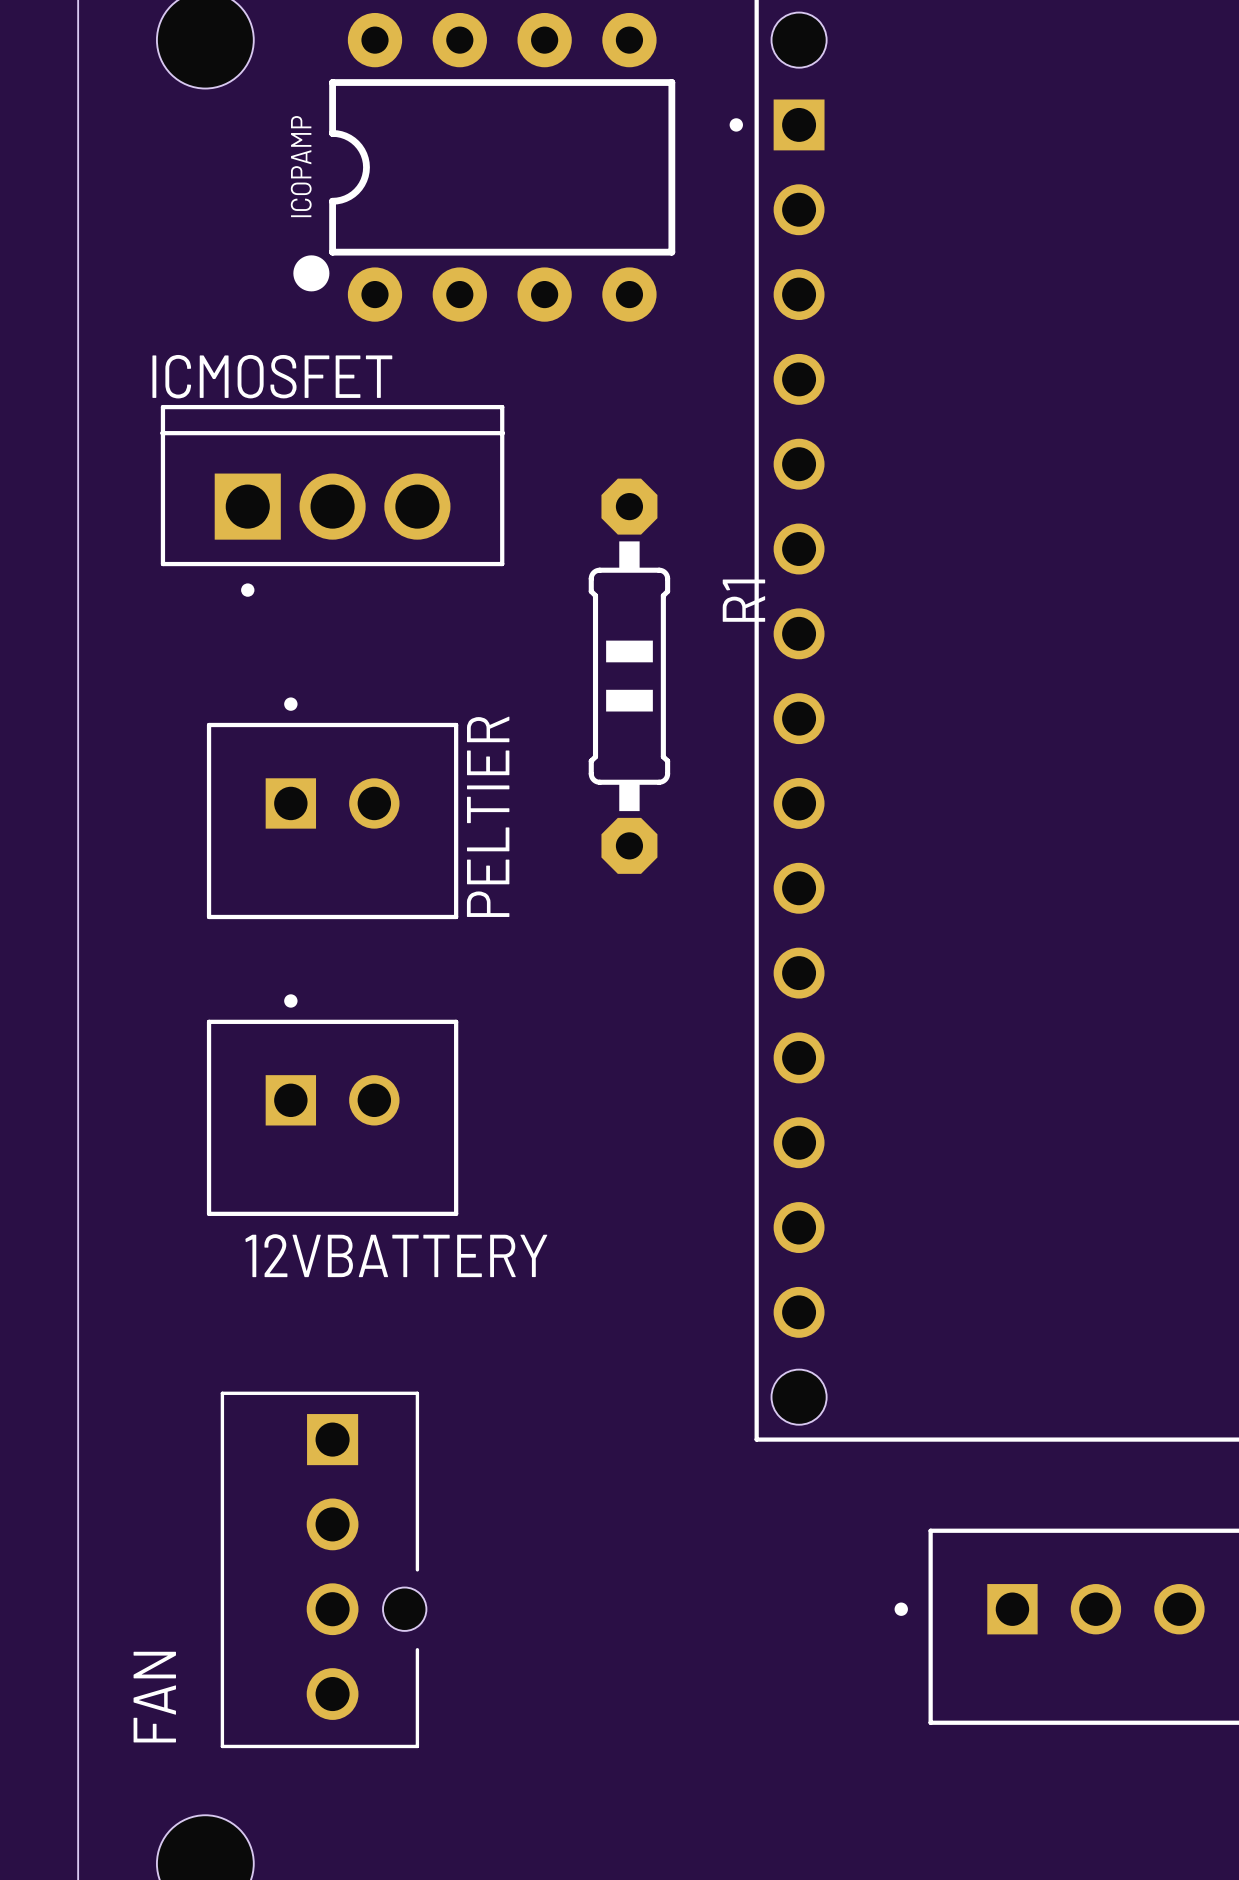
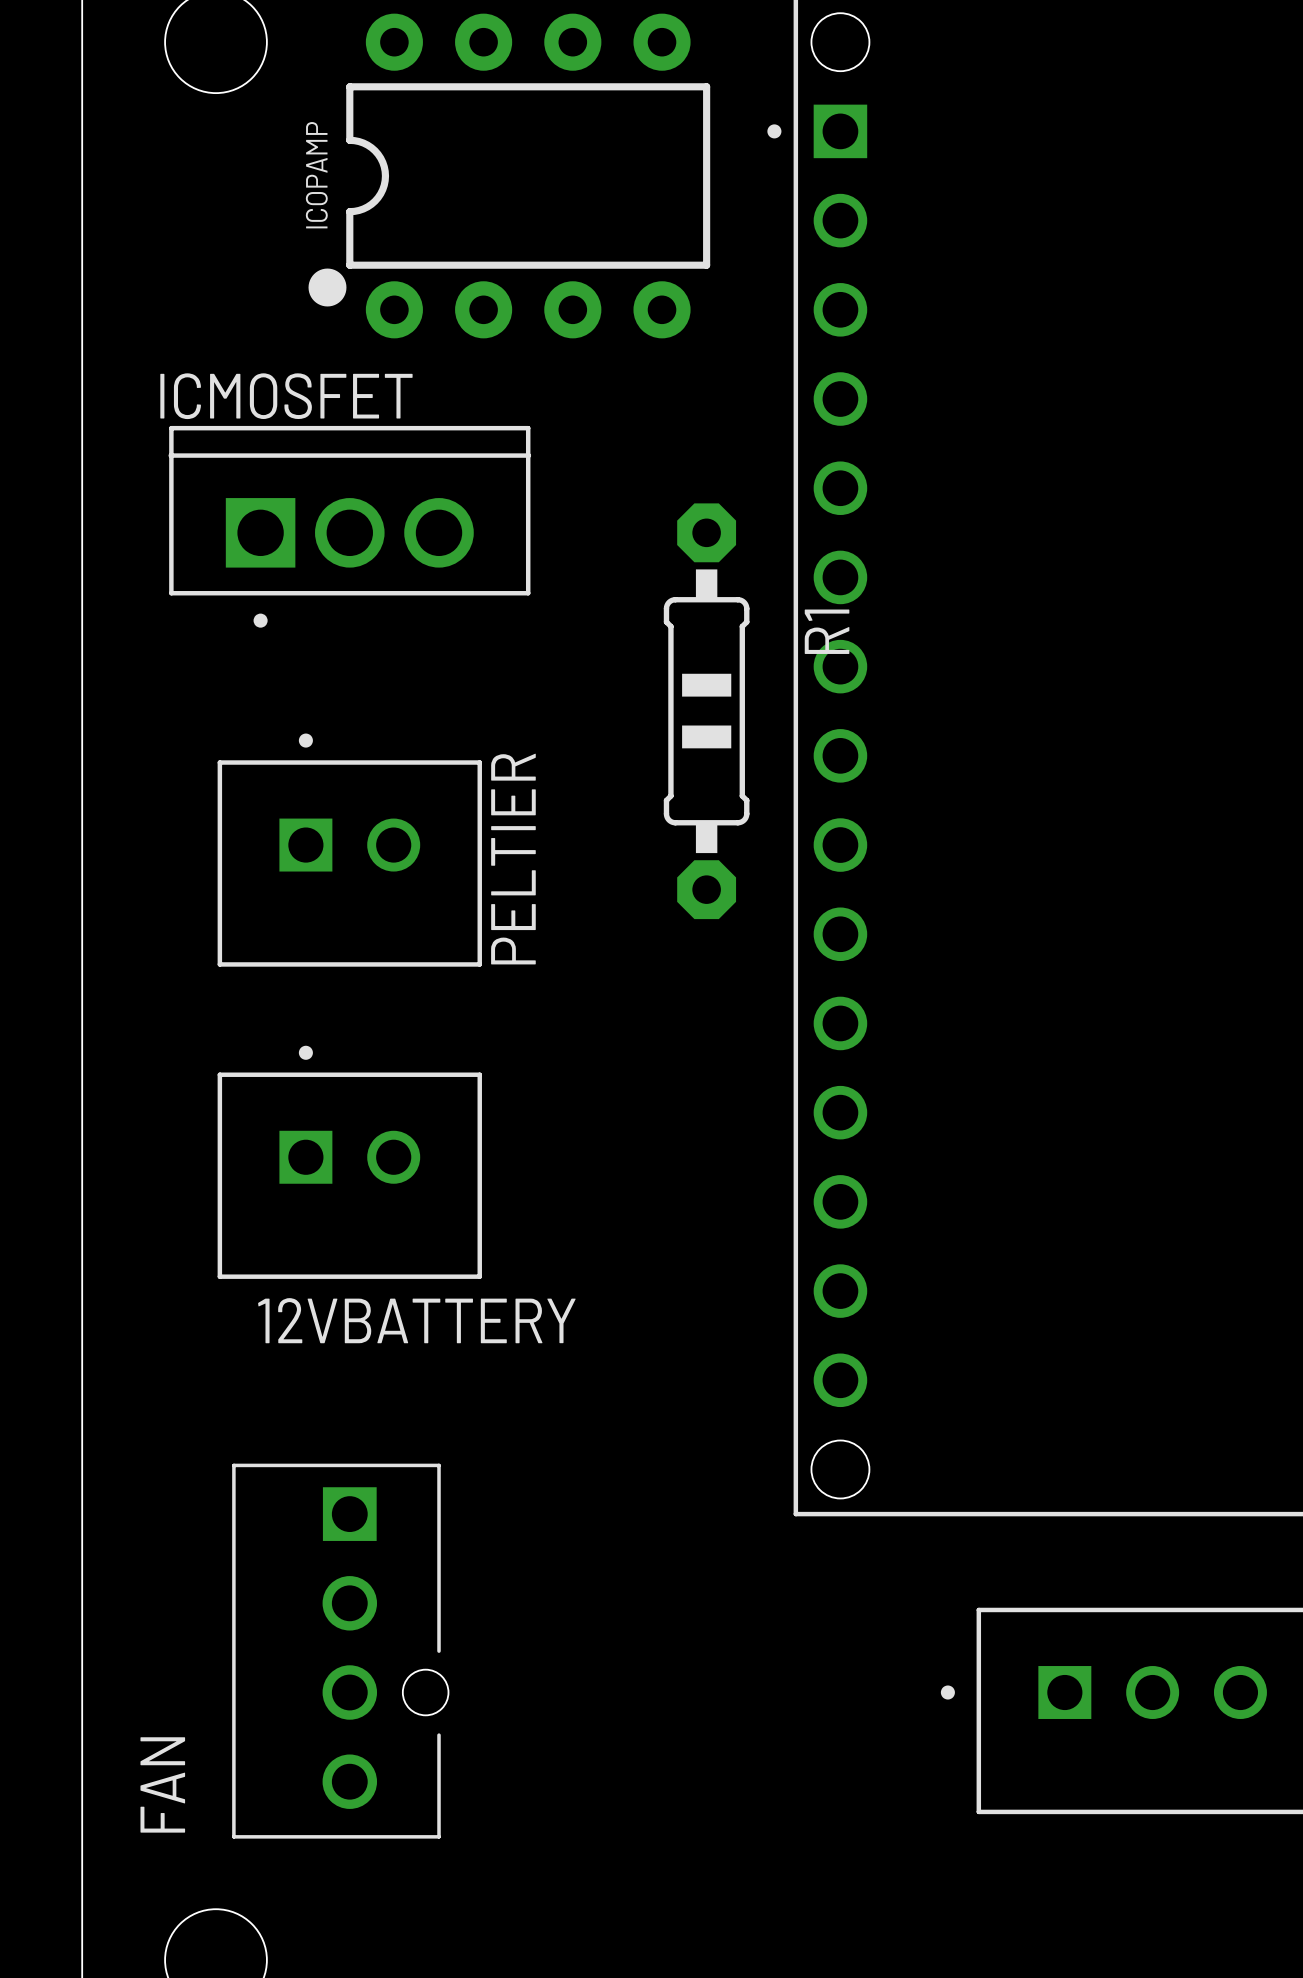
R1 position: (629, 676) -> (706, 711)

